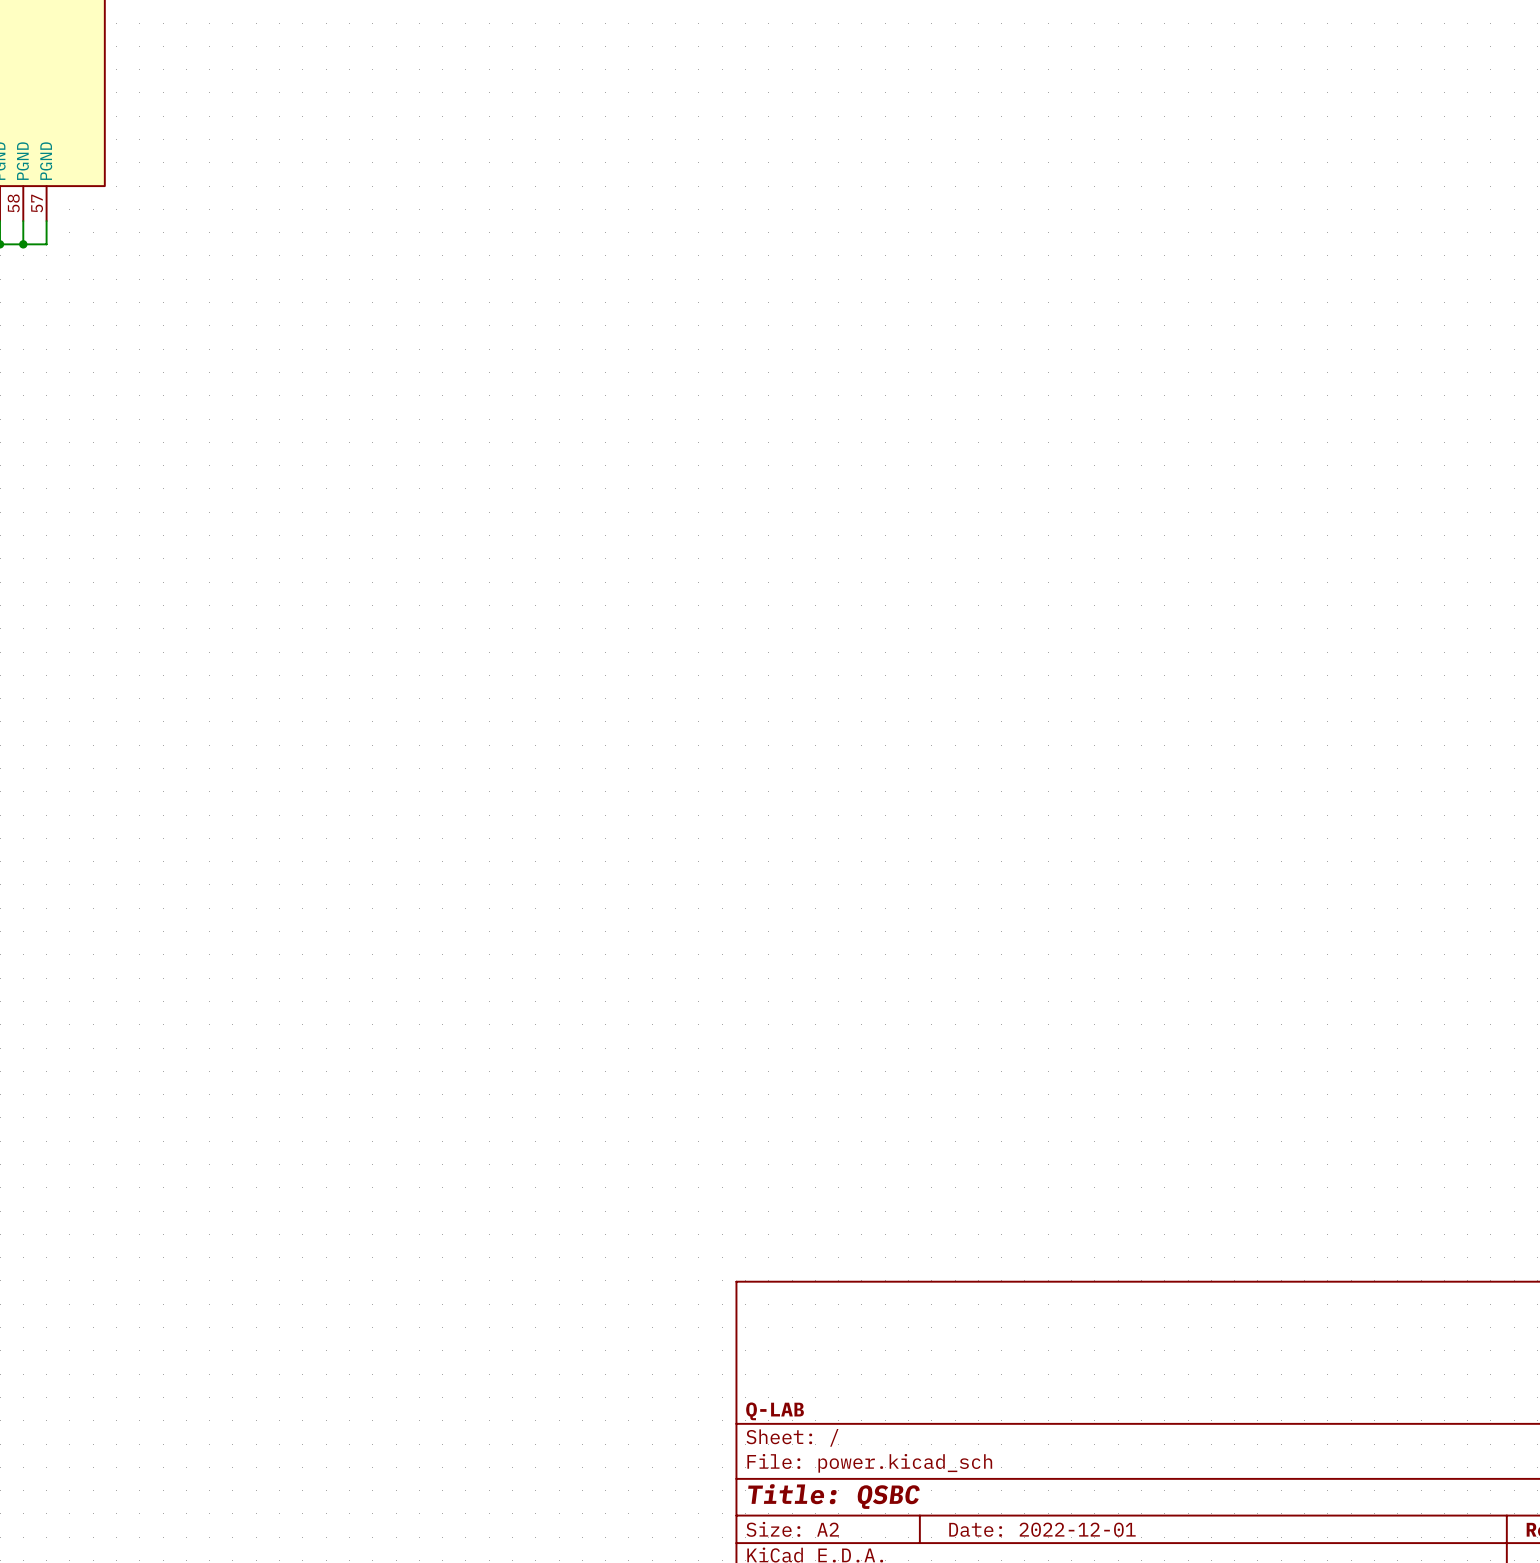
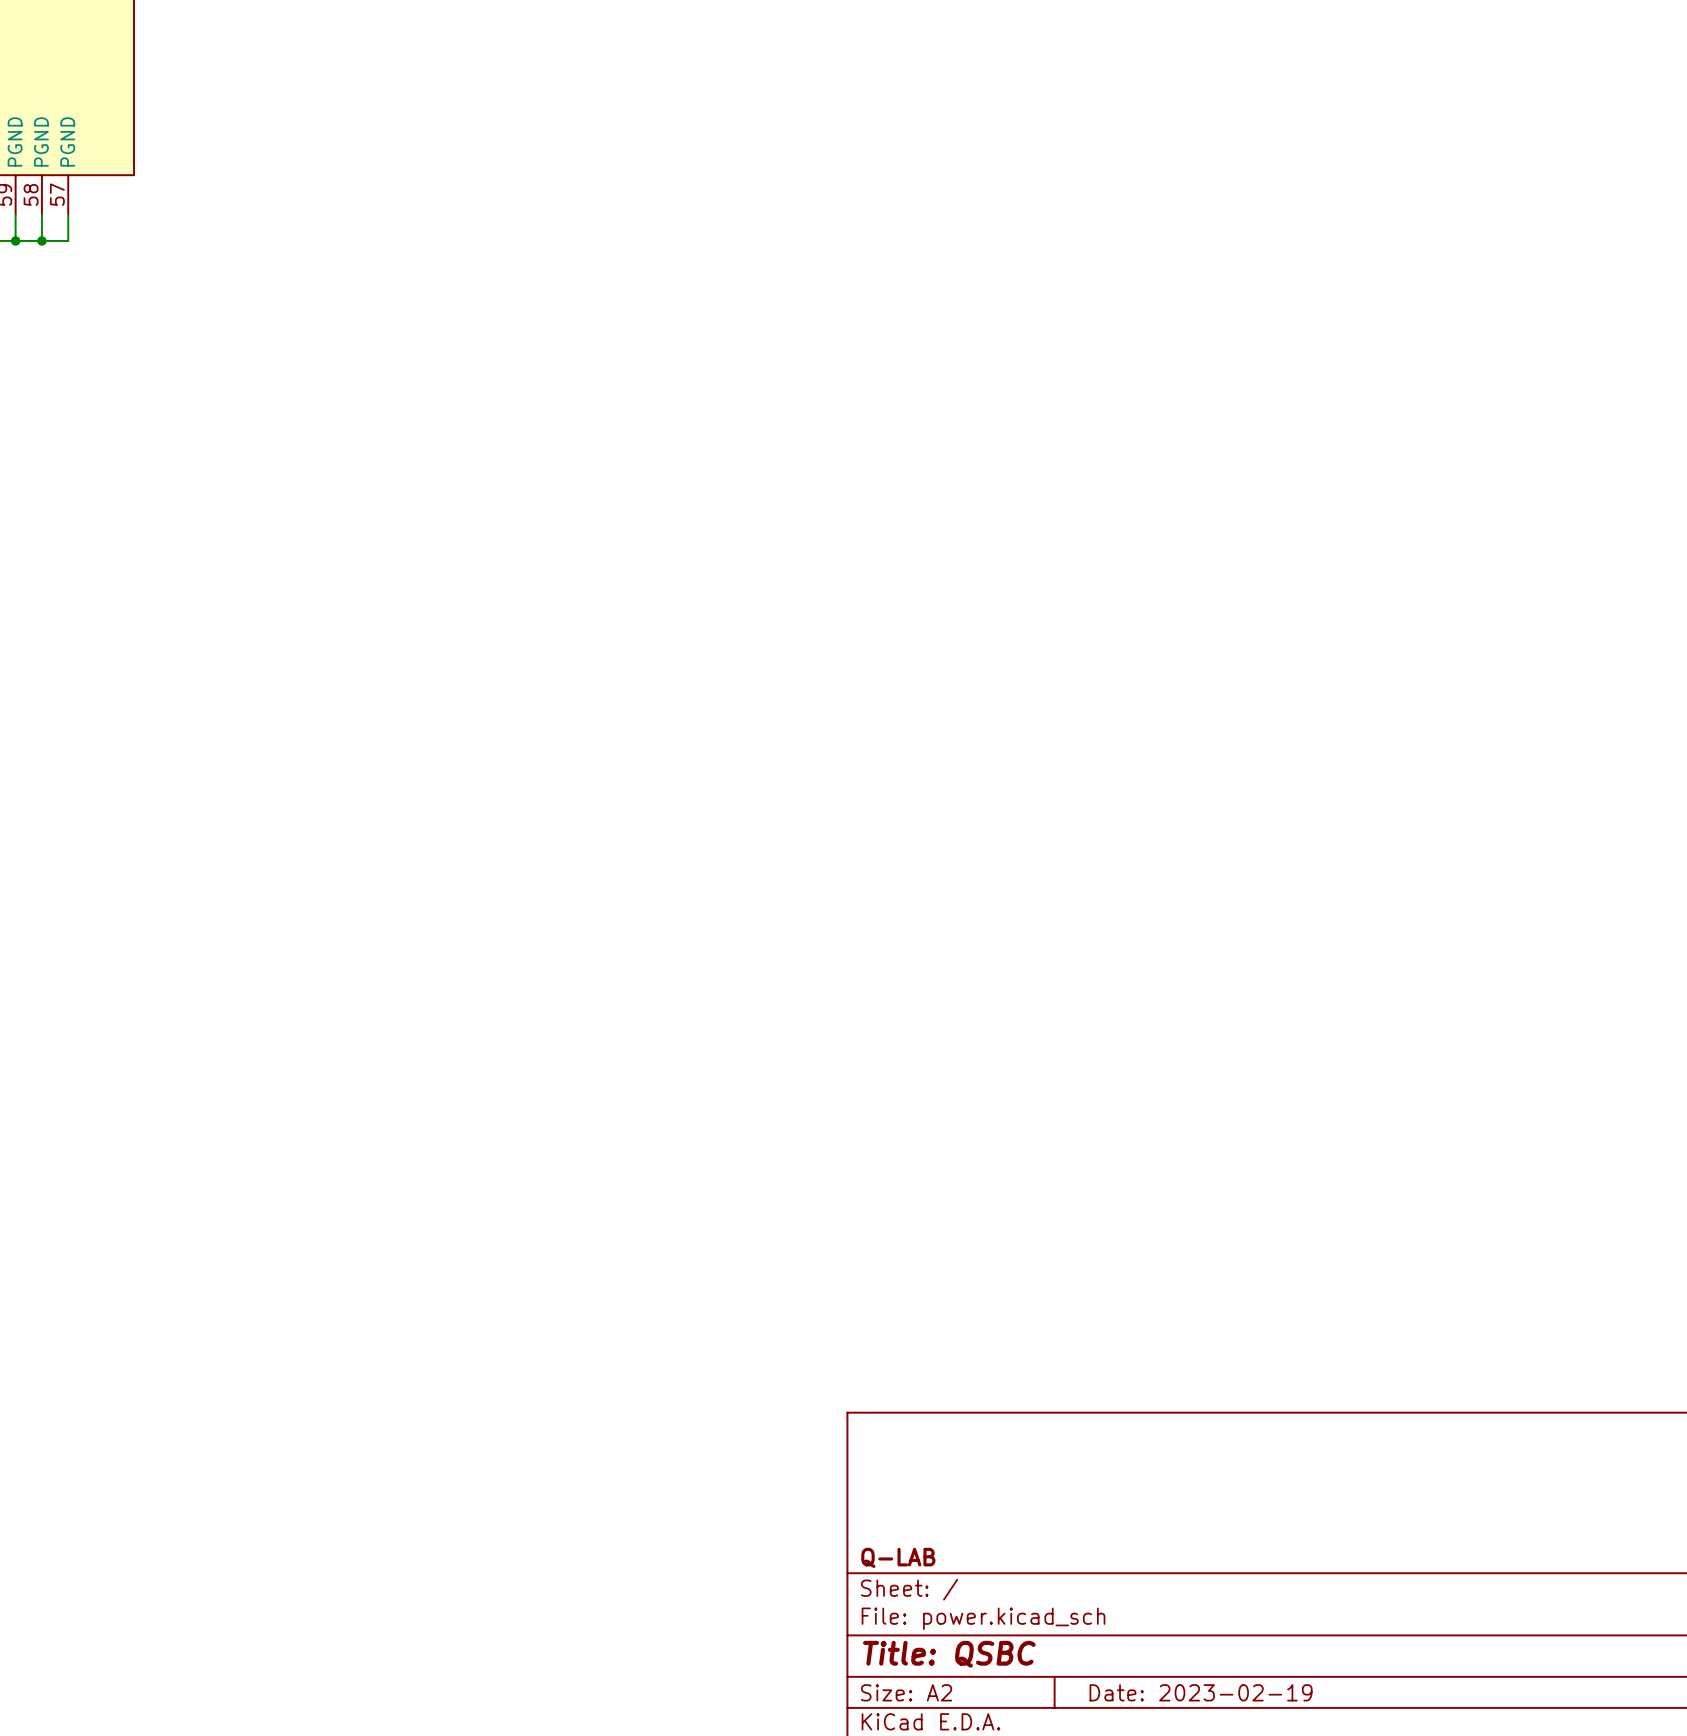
title block: Date: 2022-12-01 (1042, 1529) -> Date: 2023-02-19 (1201, 1692)

